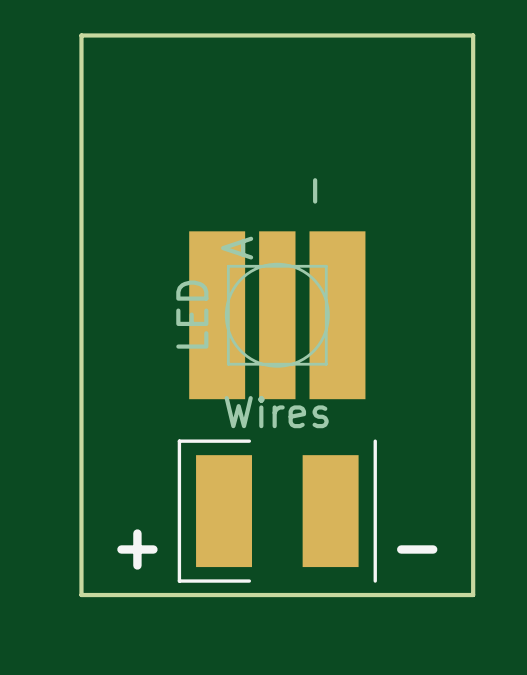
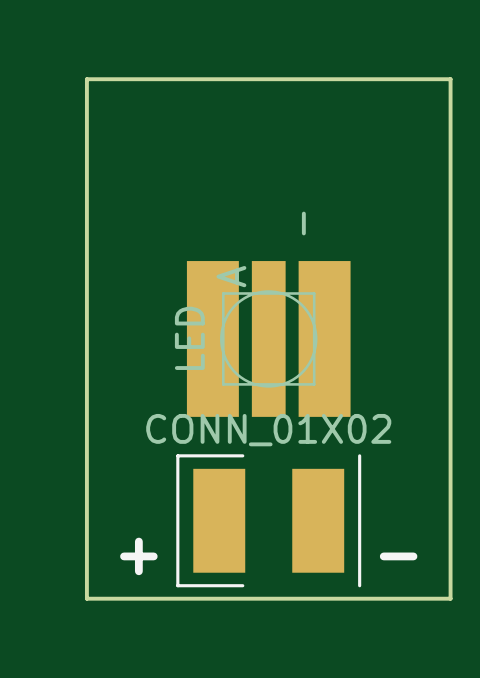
part value: Wires (276, 412) -> CONN_01X02 (268, 430)

